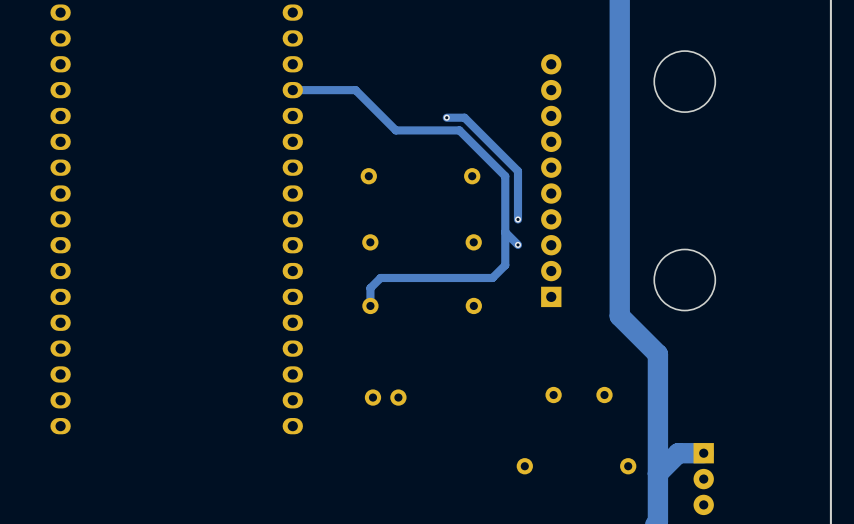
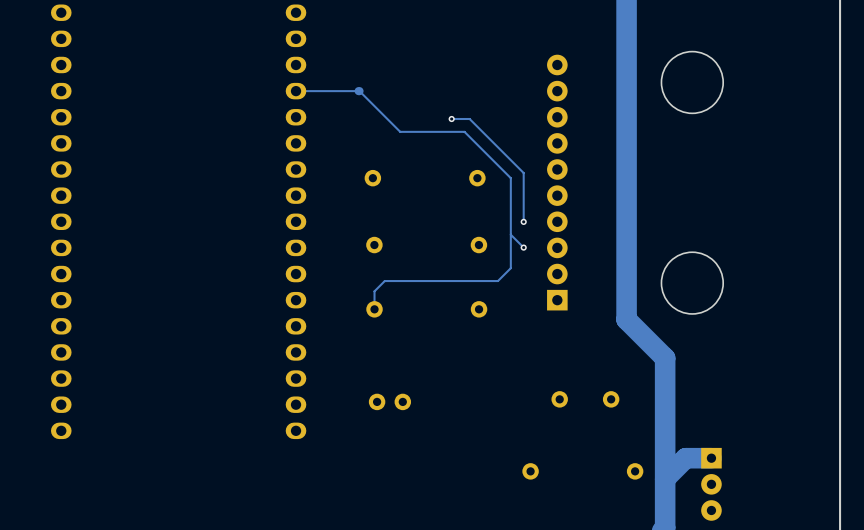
track width: thick (354, 90) (292, 90) -> thin (358, 91) (296, 91)
track width: thick (355, 90) (395, 130) (459, 130) (505, 176) (505, 265) (492, 277) (380, 277) (370, 288) (370, 305) -> thin (359, 91) (400, 131) (464, 131) (510, 178) (510, 268) (497, 281) (384, 281) (374, 291) (374, 309)
track width: thick (446, 117) (464, 117) (517, 171) (517, 219) -> thin (451, 119) (469, 119) (523, 173) (523, 221)
track width: thick (505, 232) (517, 244) -> thin (510, 234) (523, 247)

